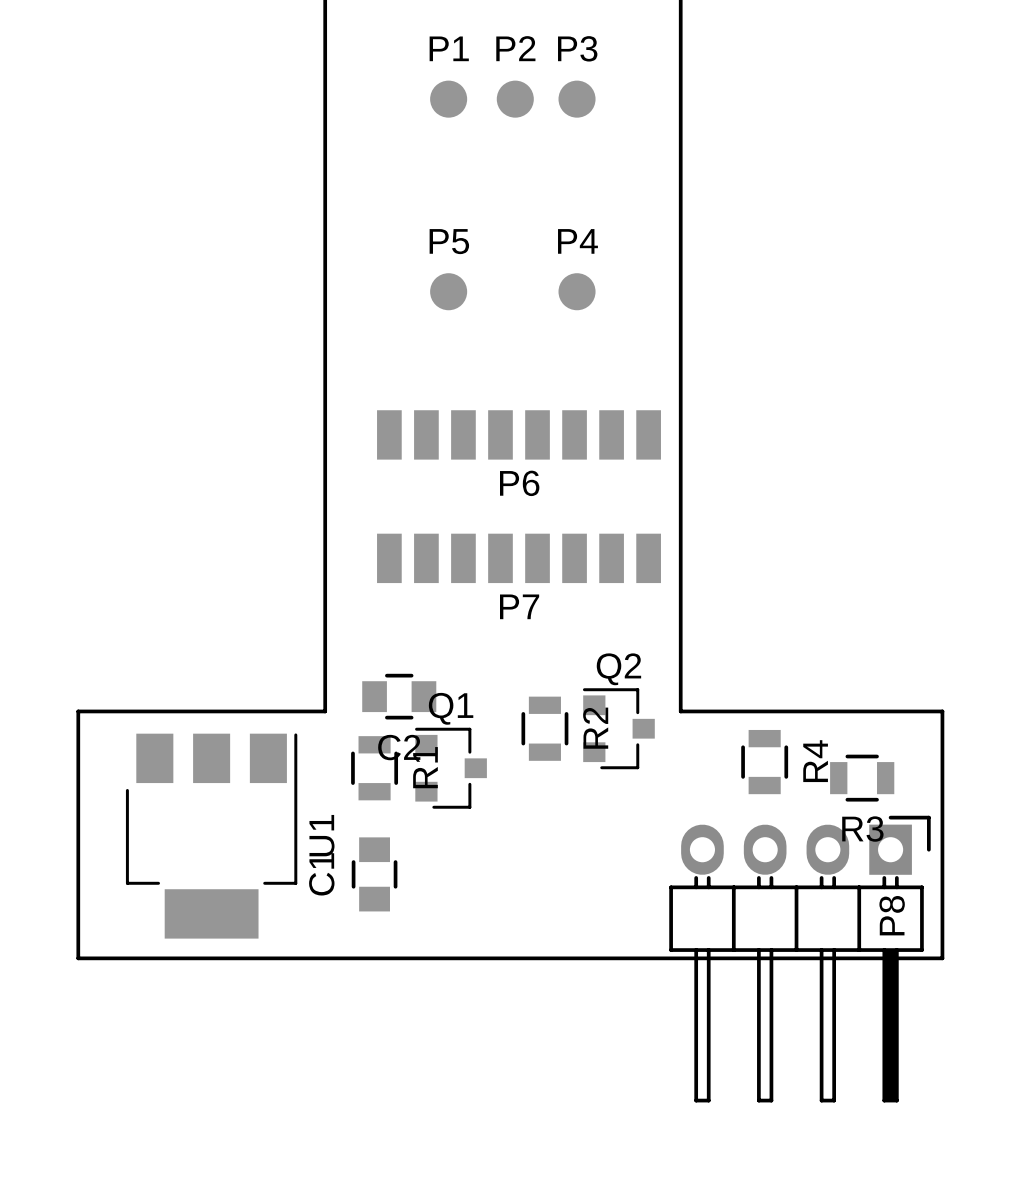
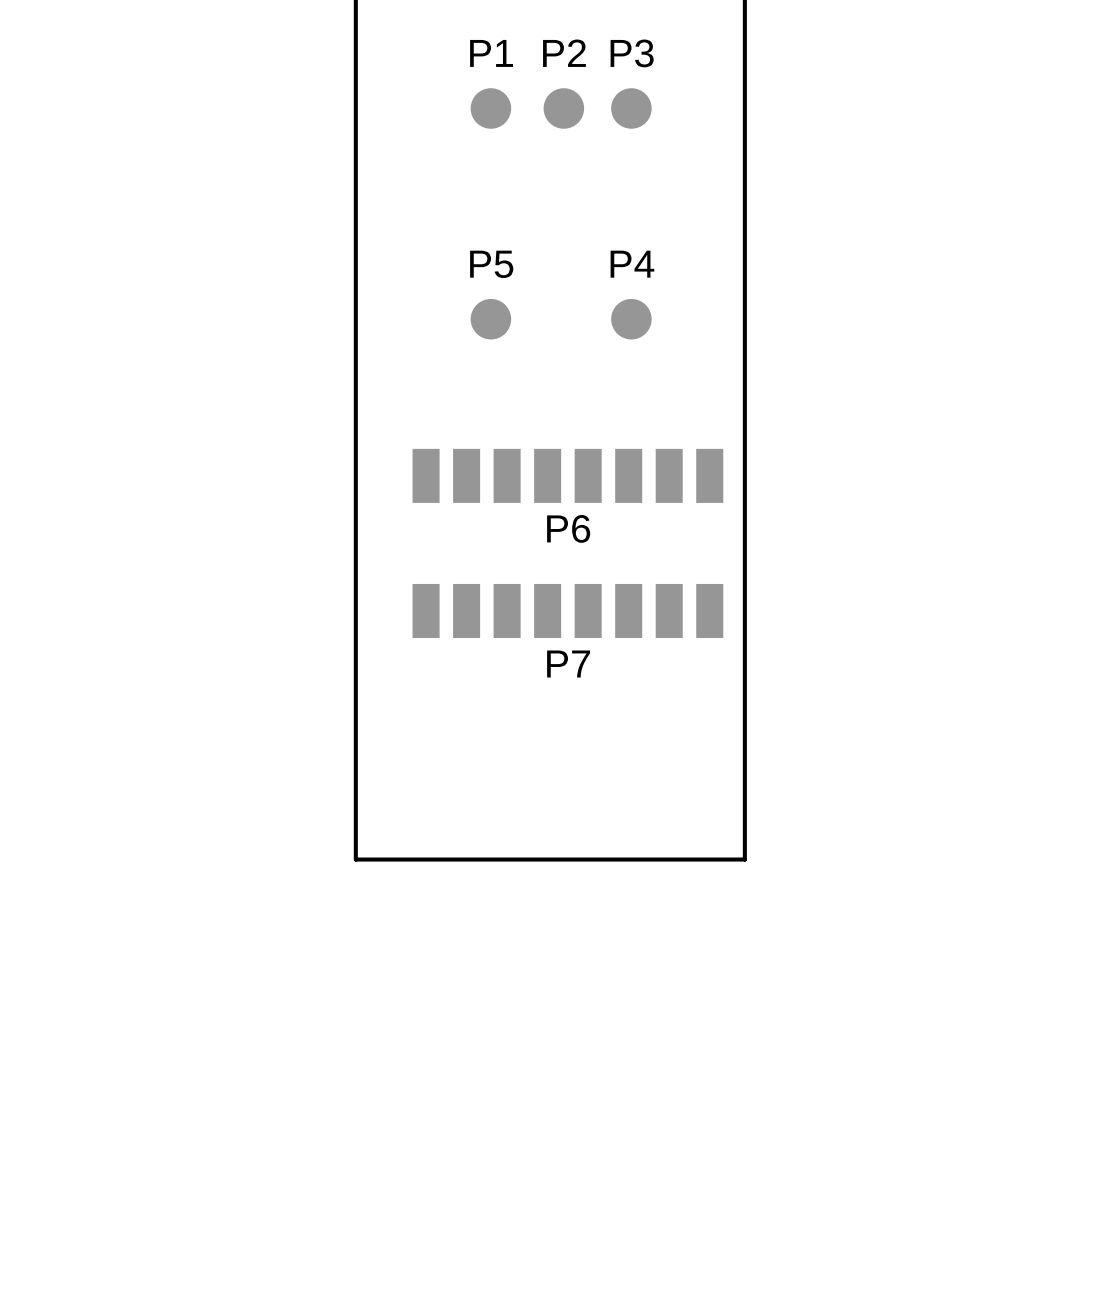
C2: (399, 696) -> none
board edge: (325, 711) (78, 711) (78, 958) (942, 958) (942, 711) (680, 711) -> (355, 778) (355, 859) (744, 859) (744, 778)
R2: (544, 728) -> none
Q2: (618, 728) -> none
R4: (764, 762) -> none
R1: (374, 768) -> none
Q1: (450, 768) -> none
R3: (862, 778) -> none
U1: (211, 836) -> none
C1: (374, 874) -> none
P8: (799, 959) -> none

